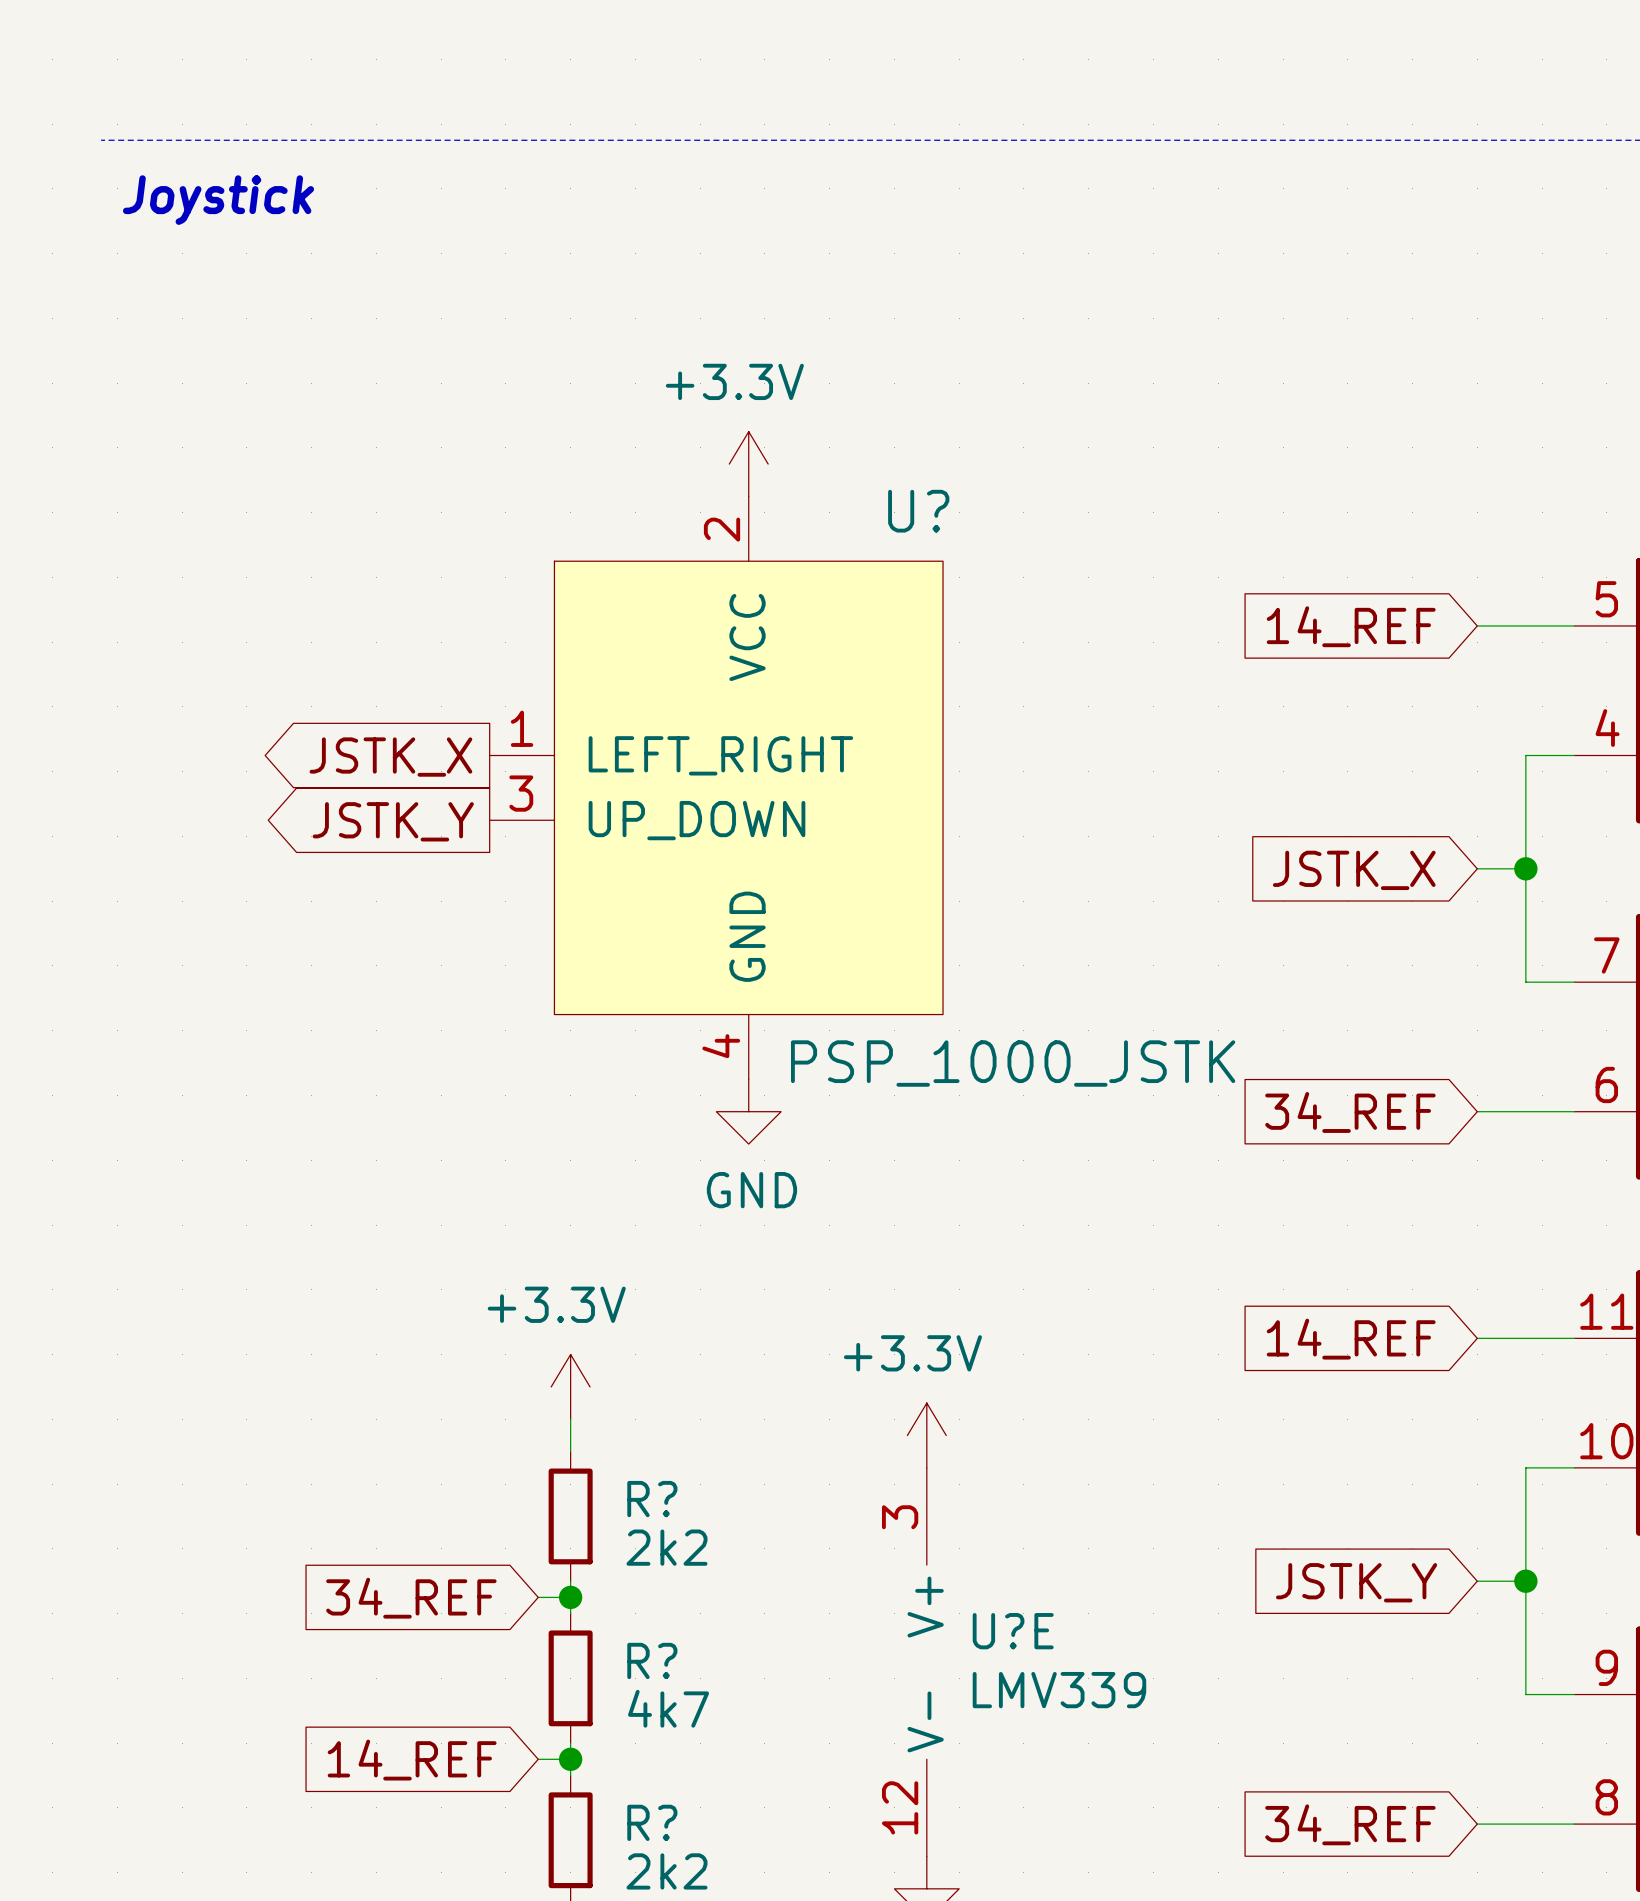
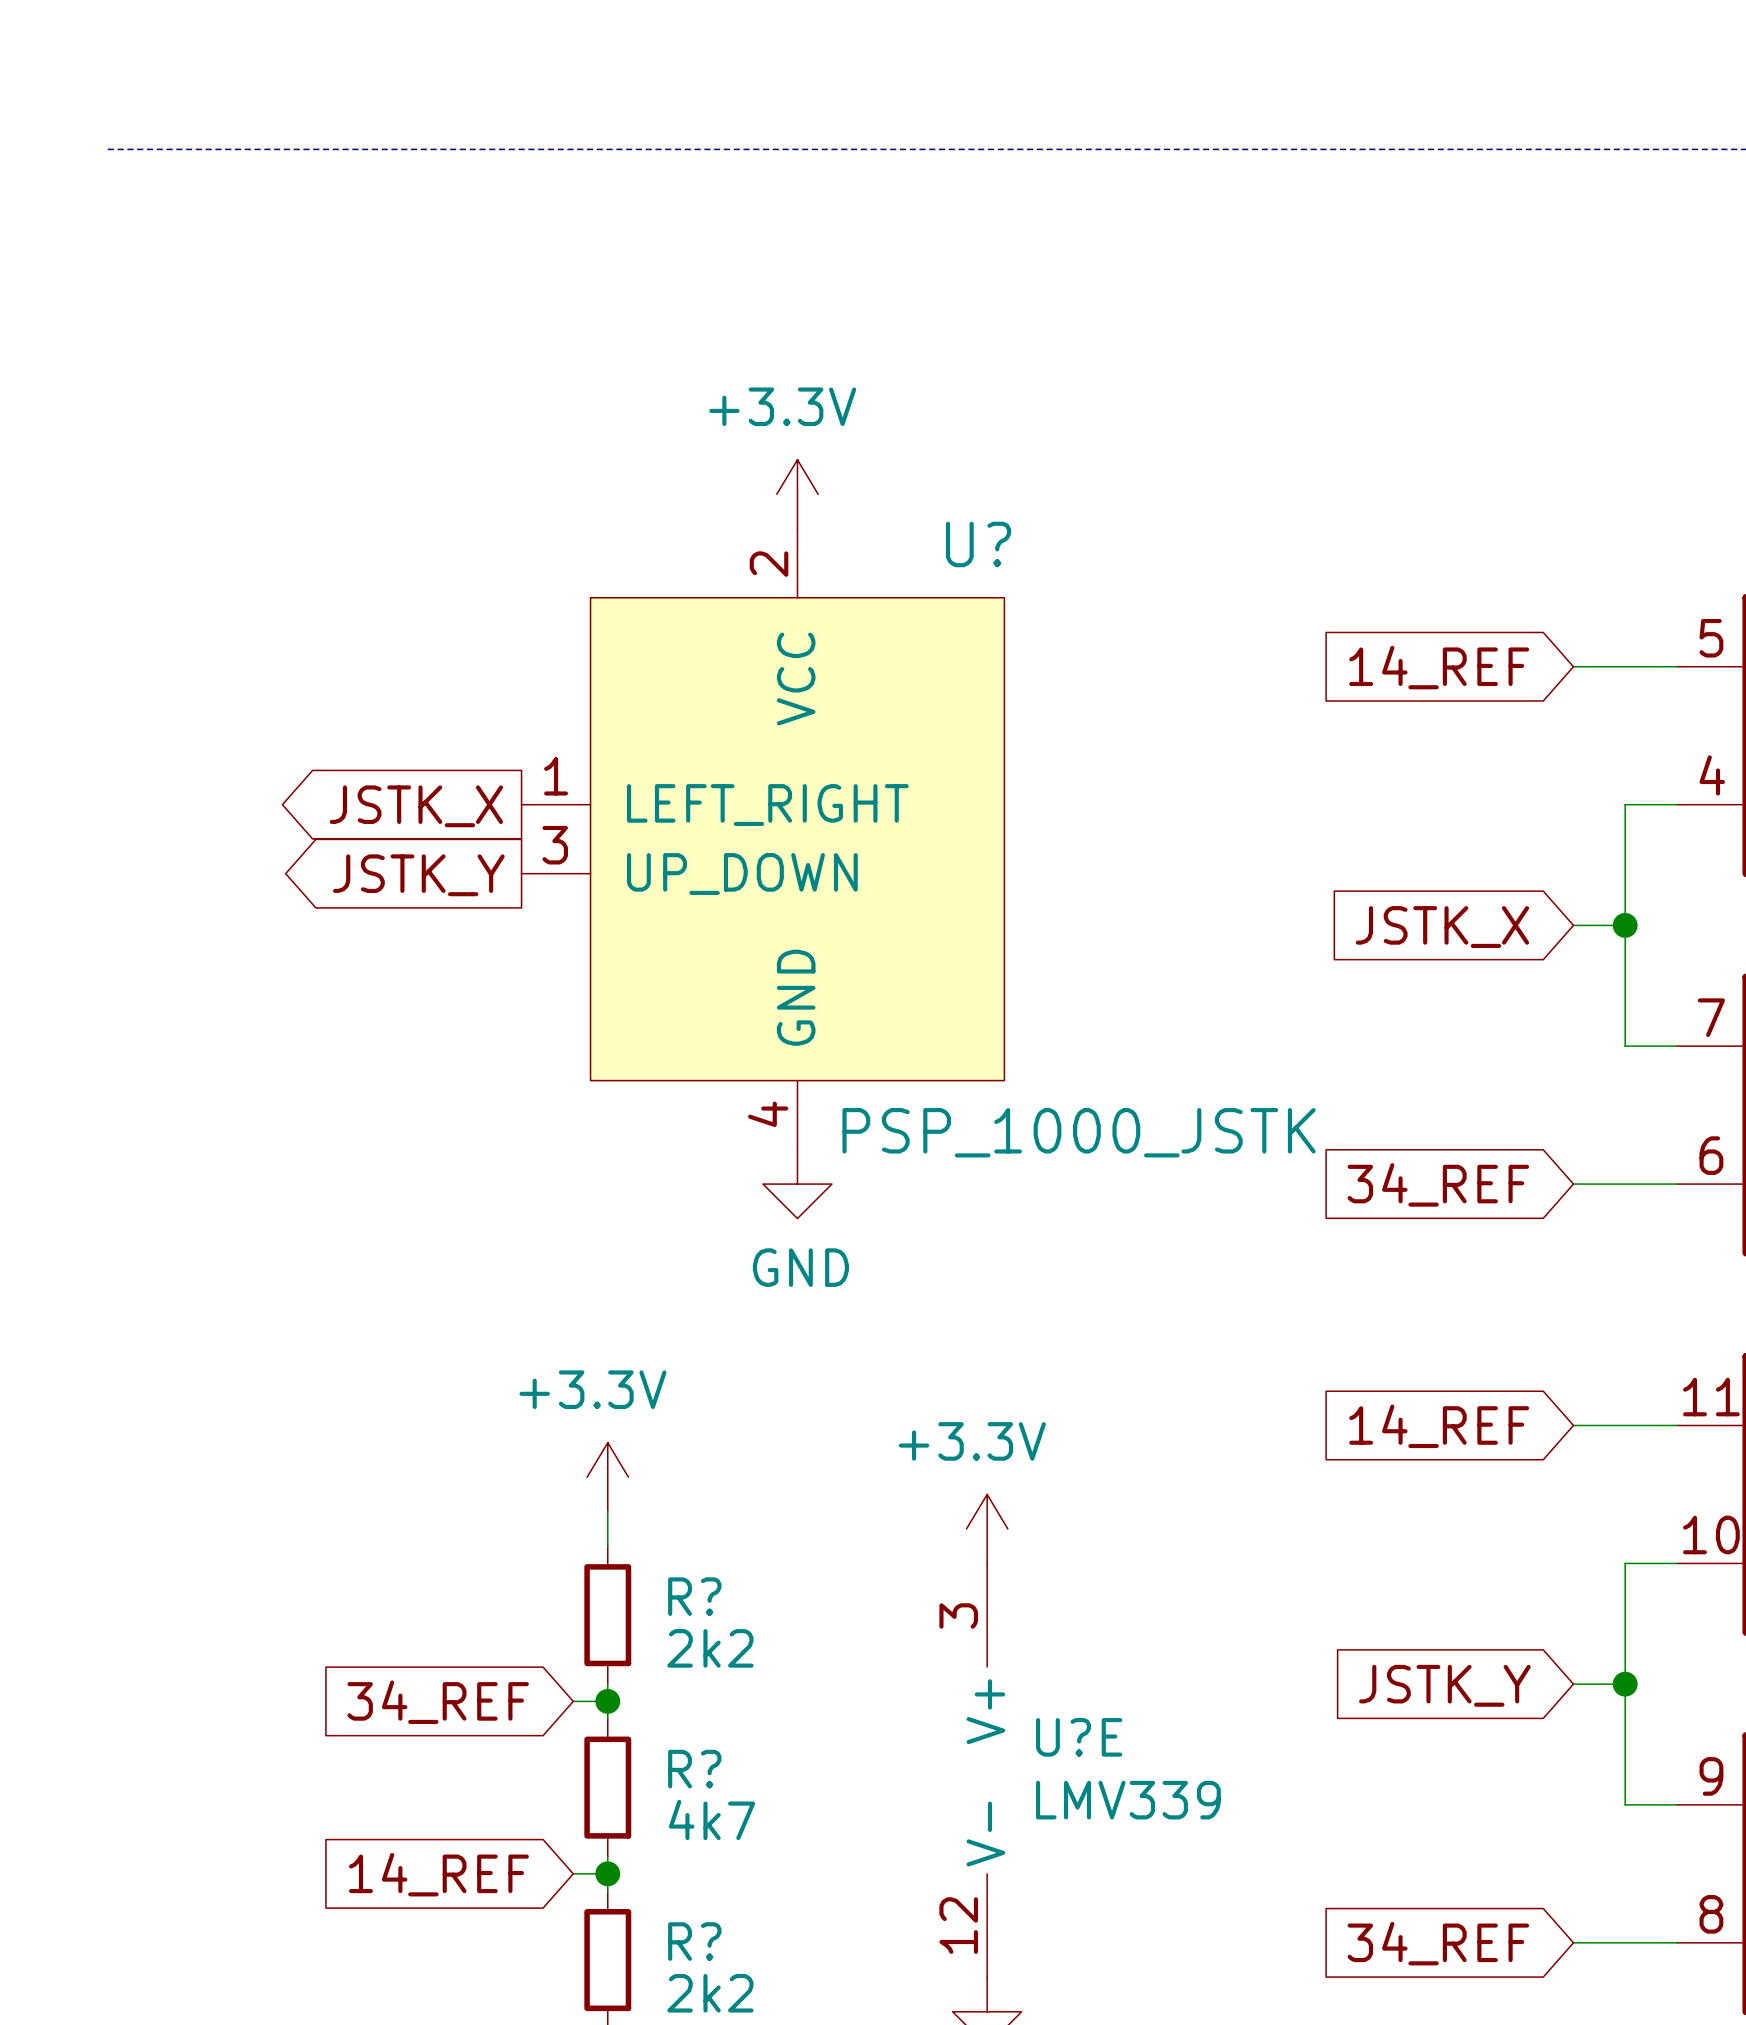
text: Joystick (218, 200) -> none

